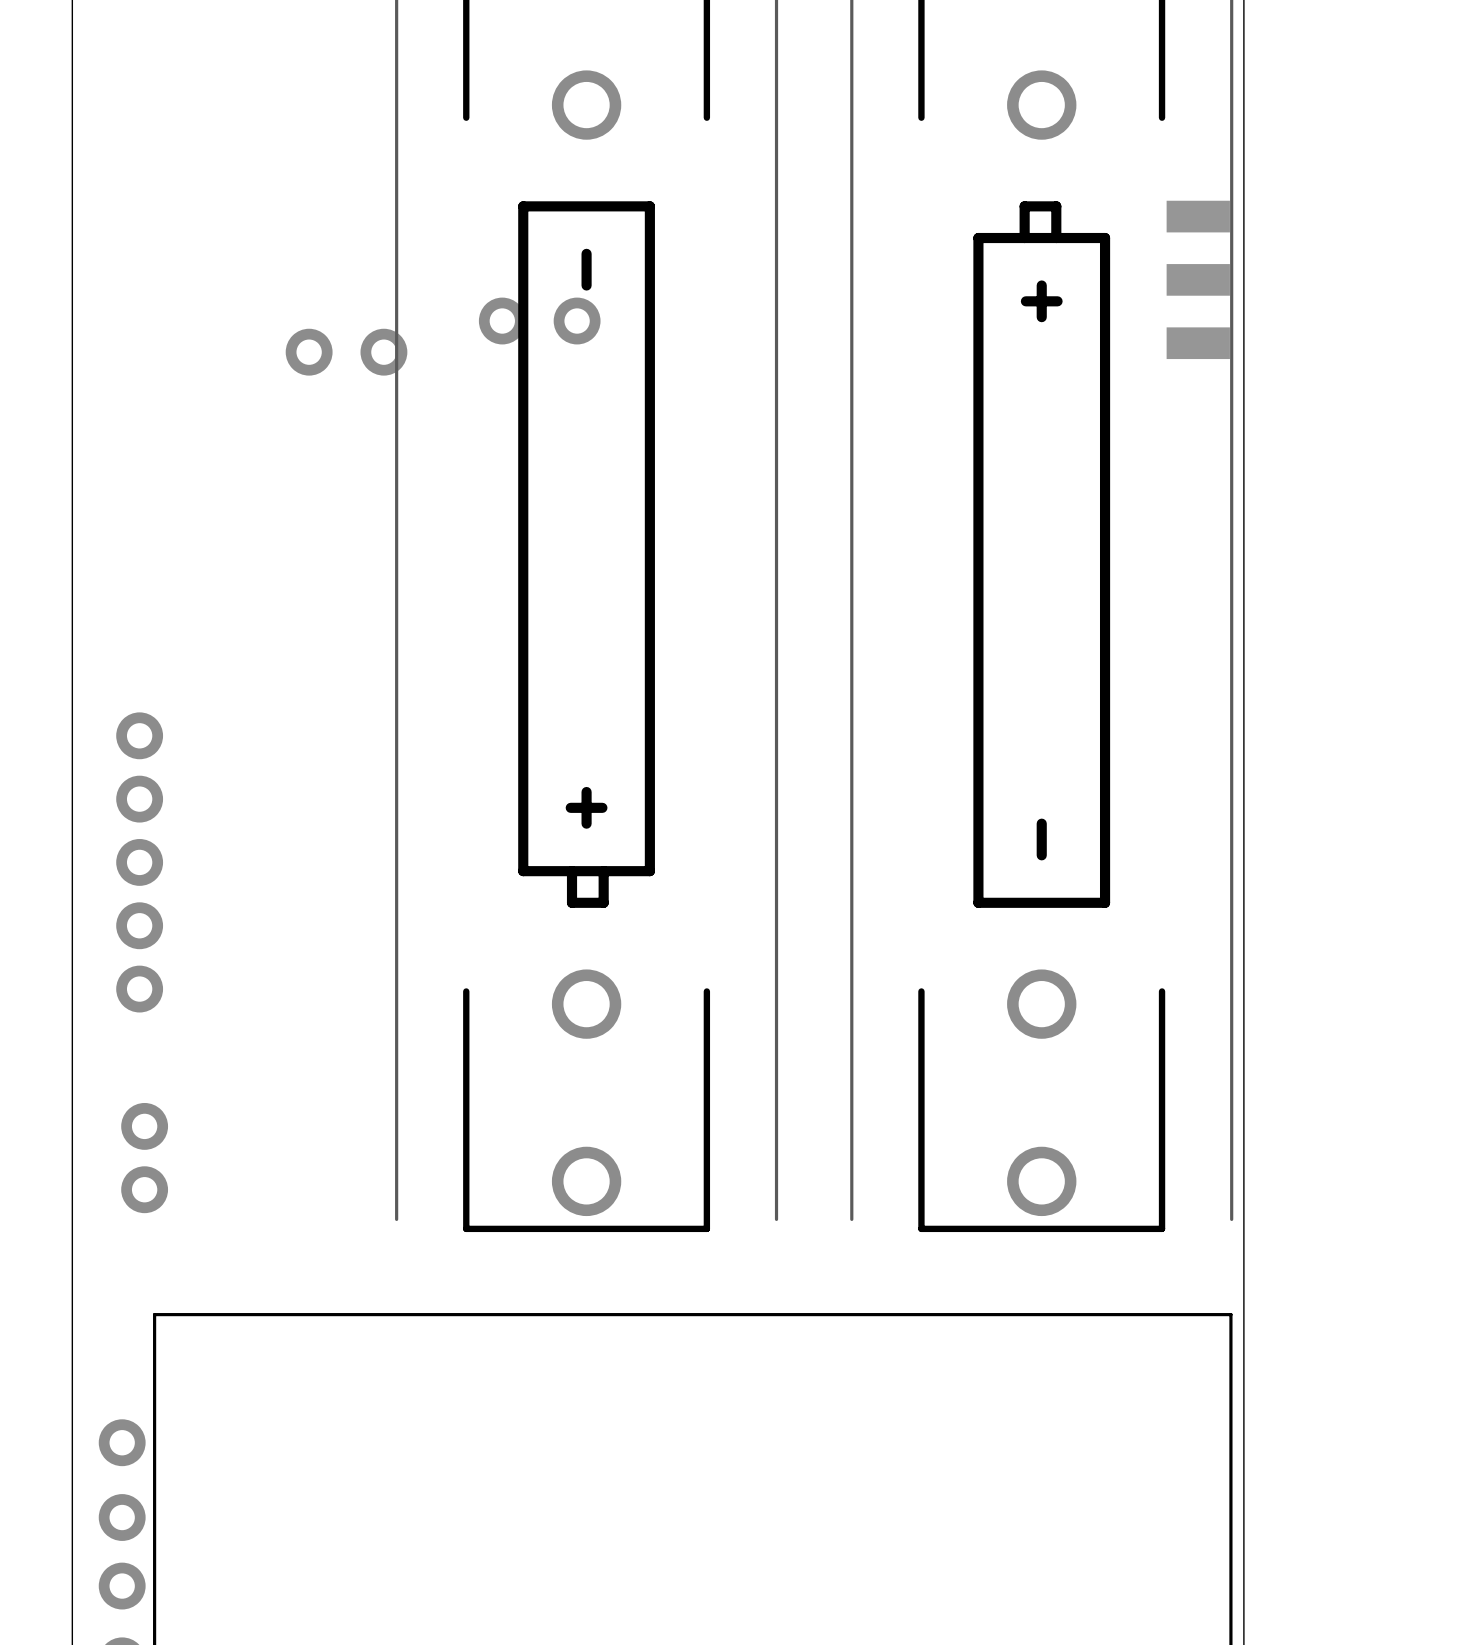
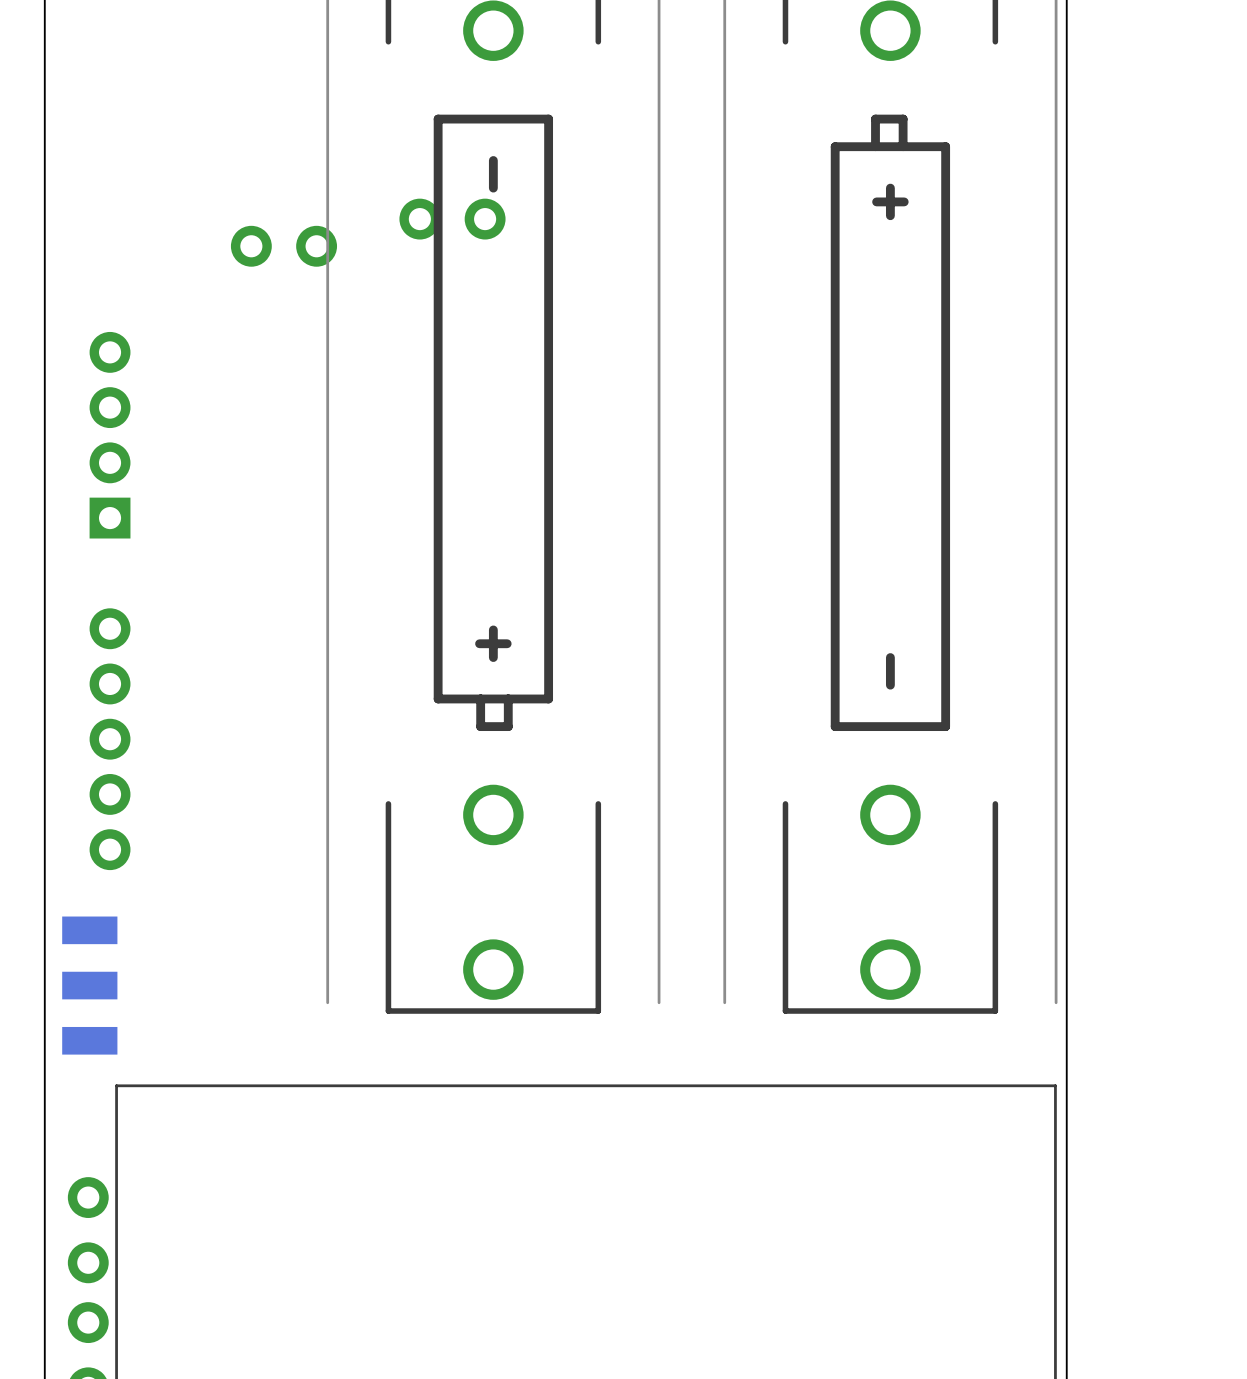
part: (1198, 279) -> none
part: none -> (110, 435)
part position: (139, 862) -> (110, 739)
part: (144, 1158) -> none
part: none -> (89, 985)

